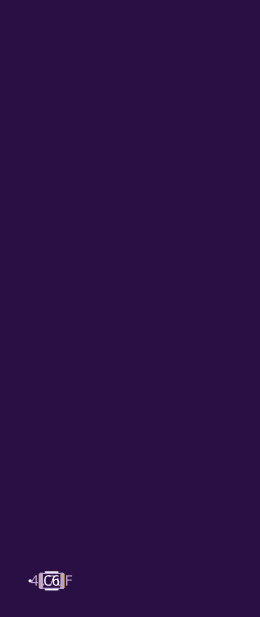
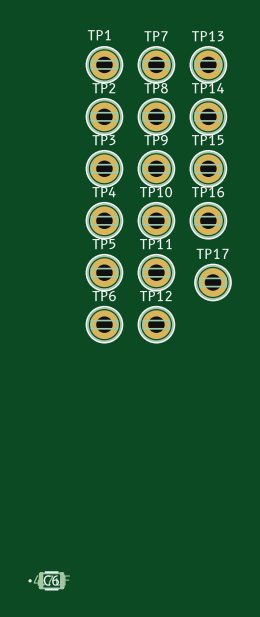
TP1: none -> (104, 64)
TP7: none -> (156, 64)
TP13: none -> (208, 64)
TP2: none -> (104, 116)
TP8: none -> (156, 116)
TP14: none -> (208, 116)
TP3: none -> (104, 168)
TP9: none -> (156, 168)
TP15: none -> (208, 168)
TP4: none -> (104, 220)
TP10: none -> (156, 220)
TP16: none -> (208, 220)
TP5: none -> (104, 272)
TP11: none -> (156, 272)
TP17: none -> (213, 282)
TP6: none -> (104, 324)
TP12: none -> (156, 324)

